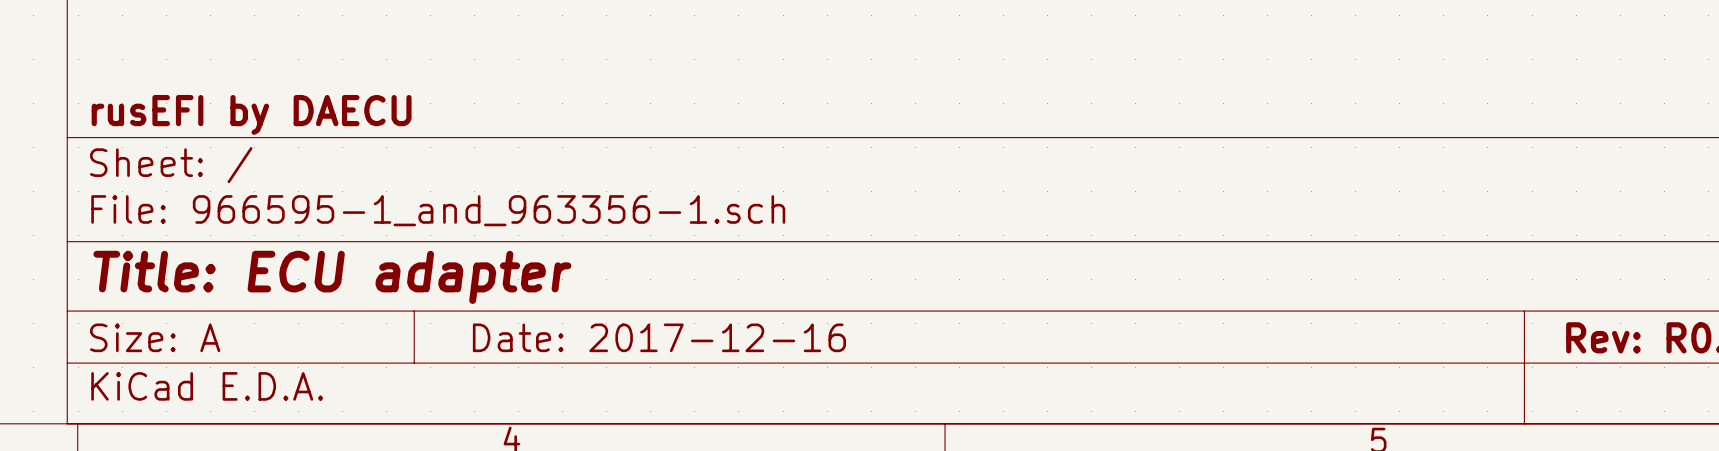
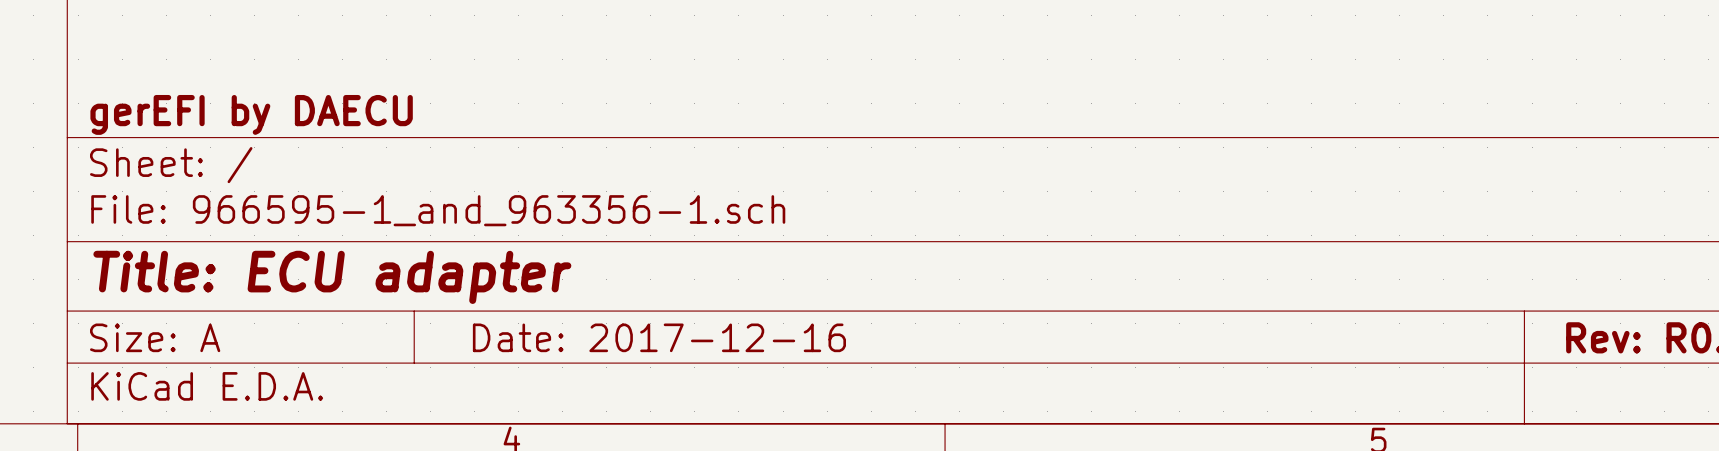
title block: rusEFI by DAECU (251, 114) -> gerEFI by DAECU (251, 114)

